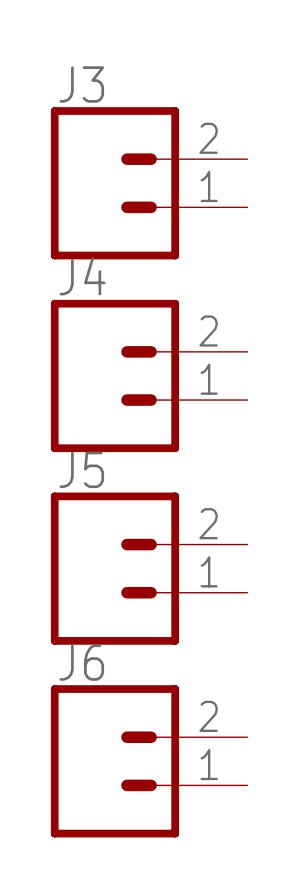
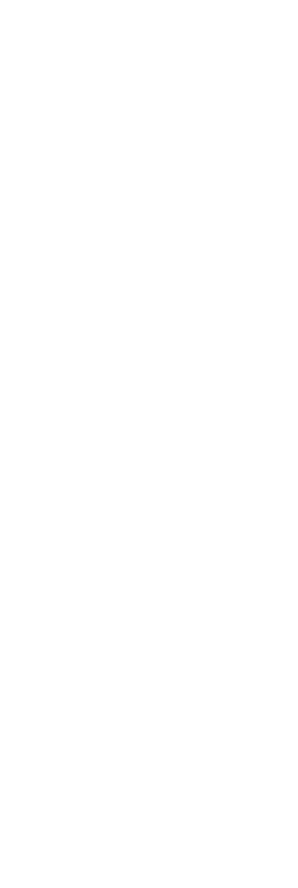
J3: (149, 183) -> none
J4: (149, 375) -> none
J5: (149, 568) -> none
J6: (149, 761) -> none

